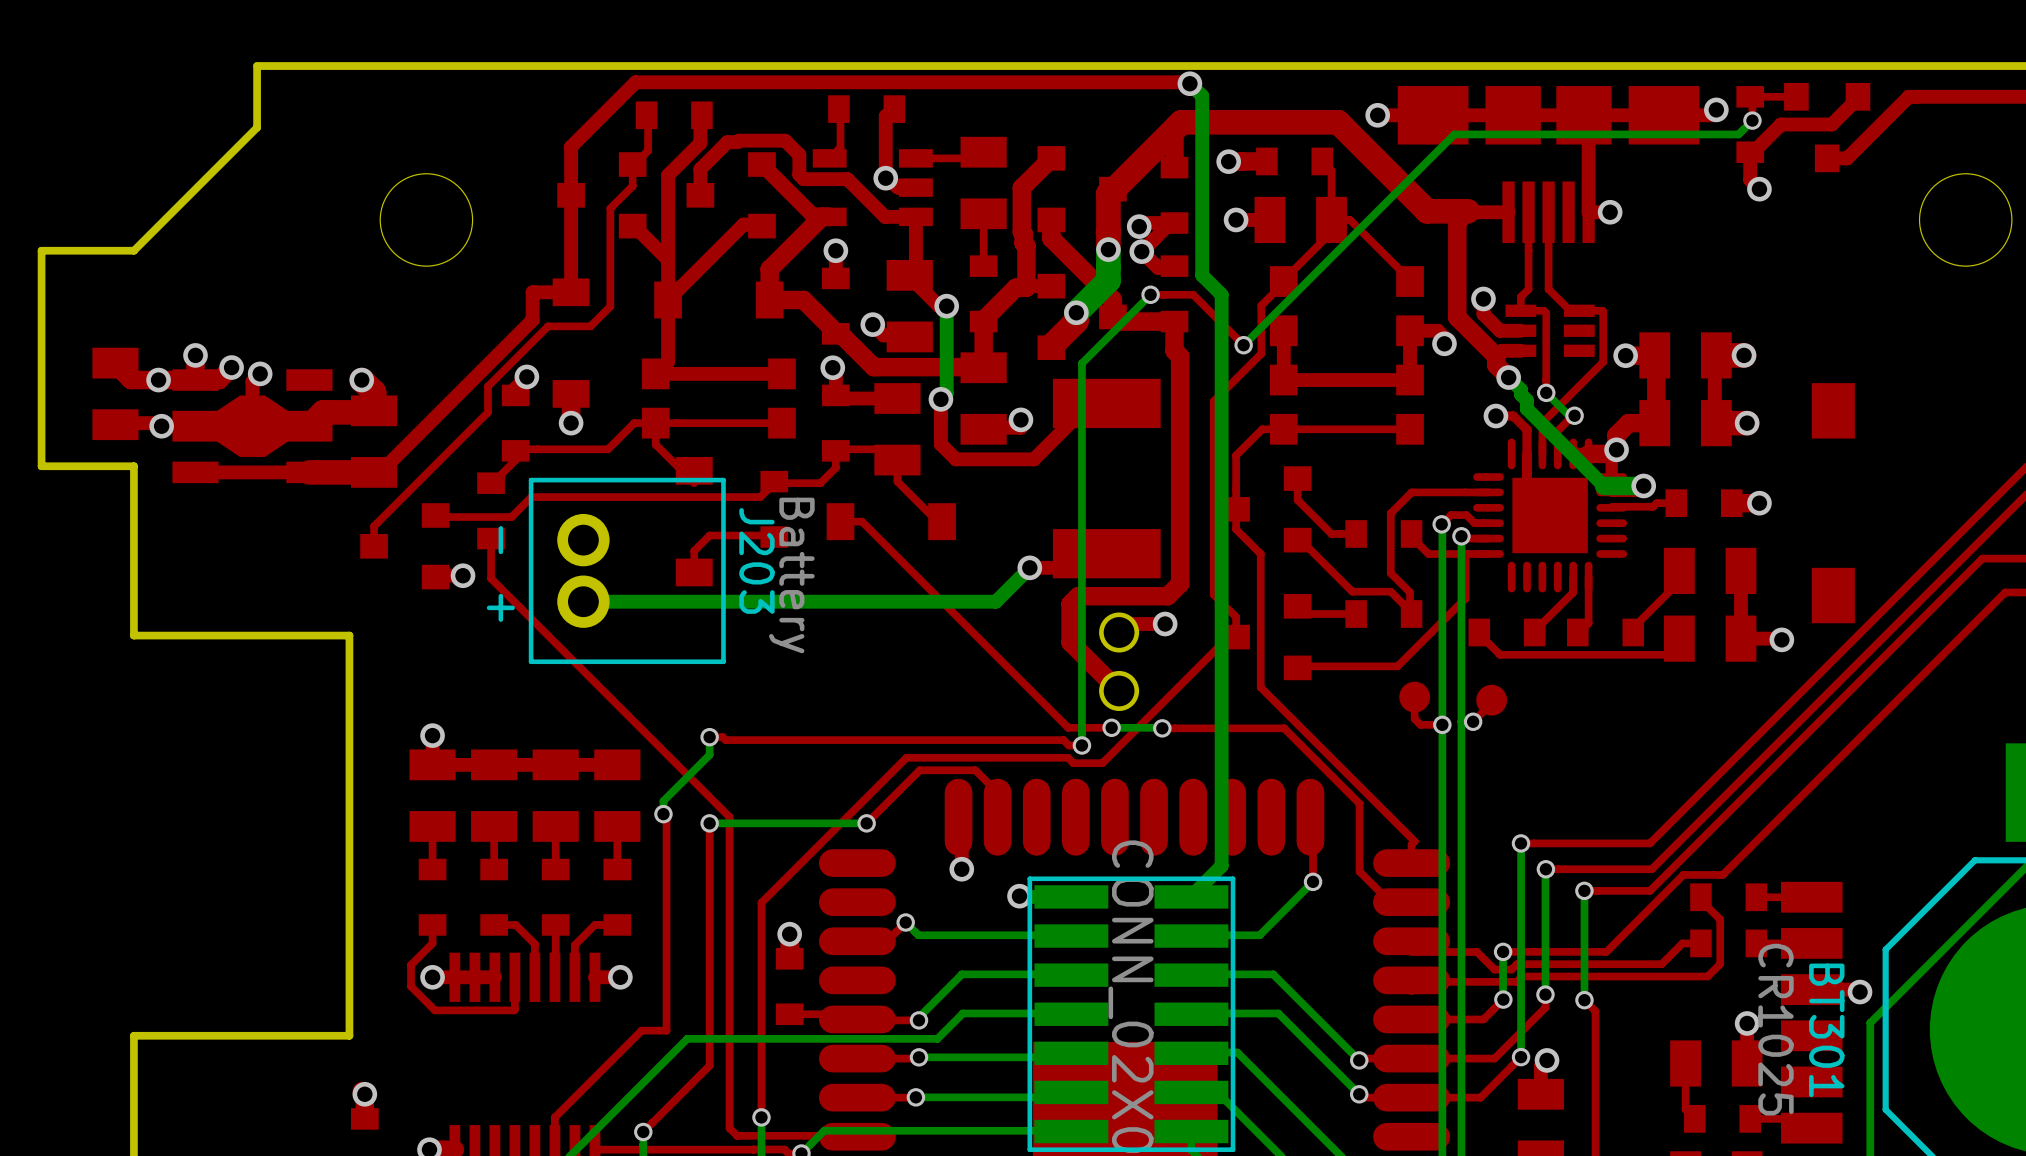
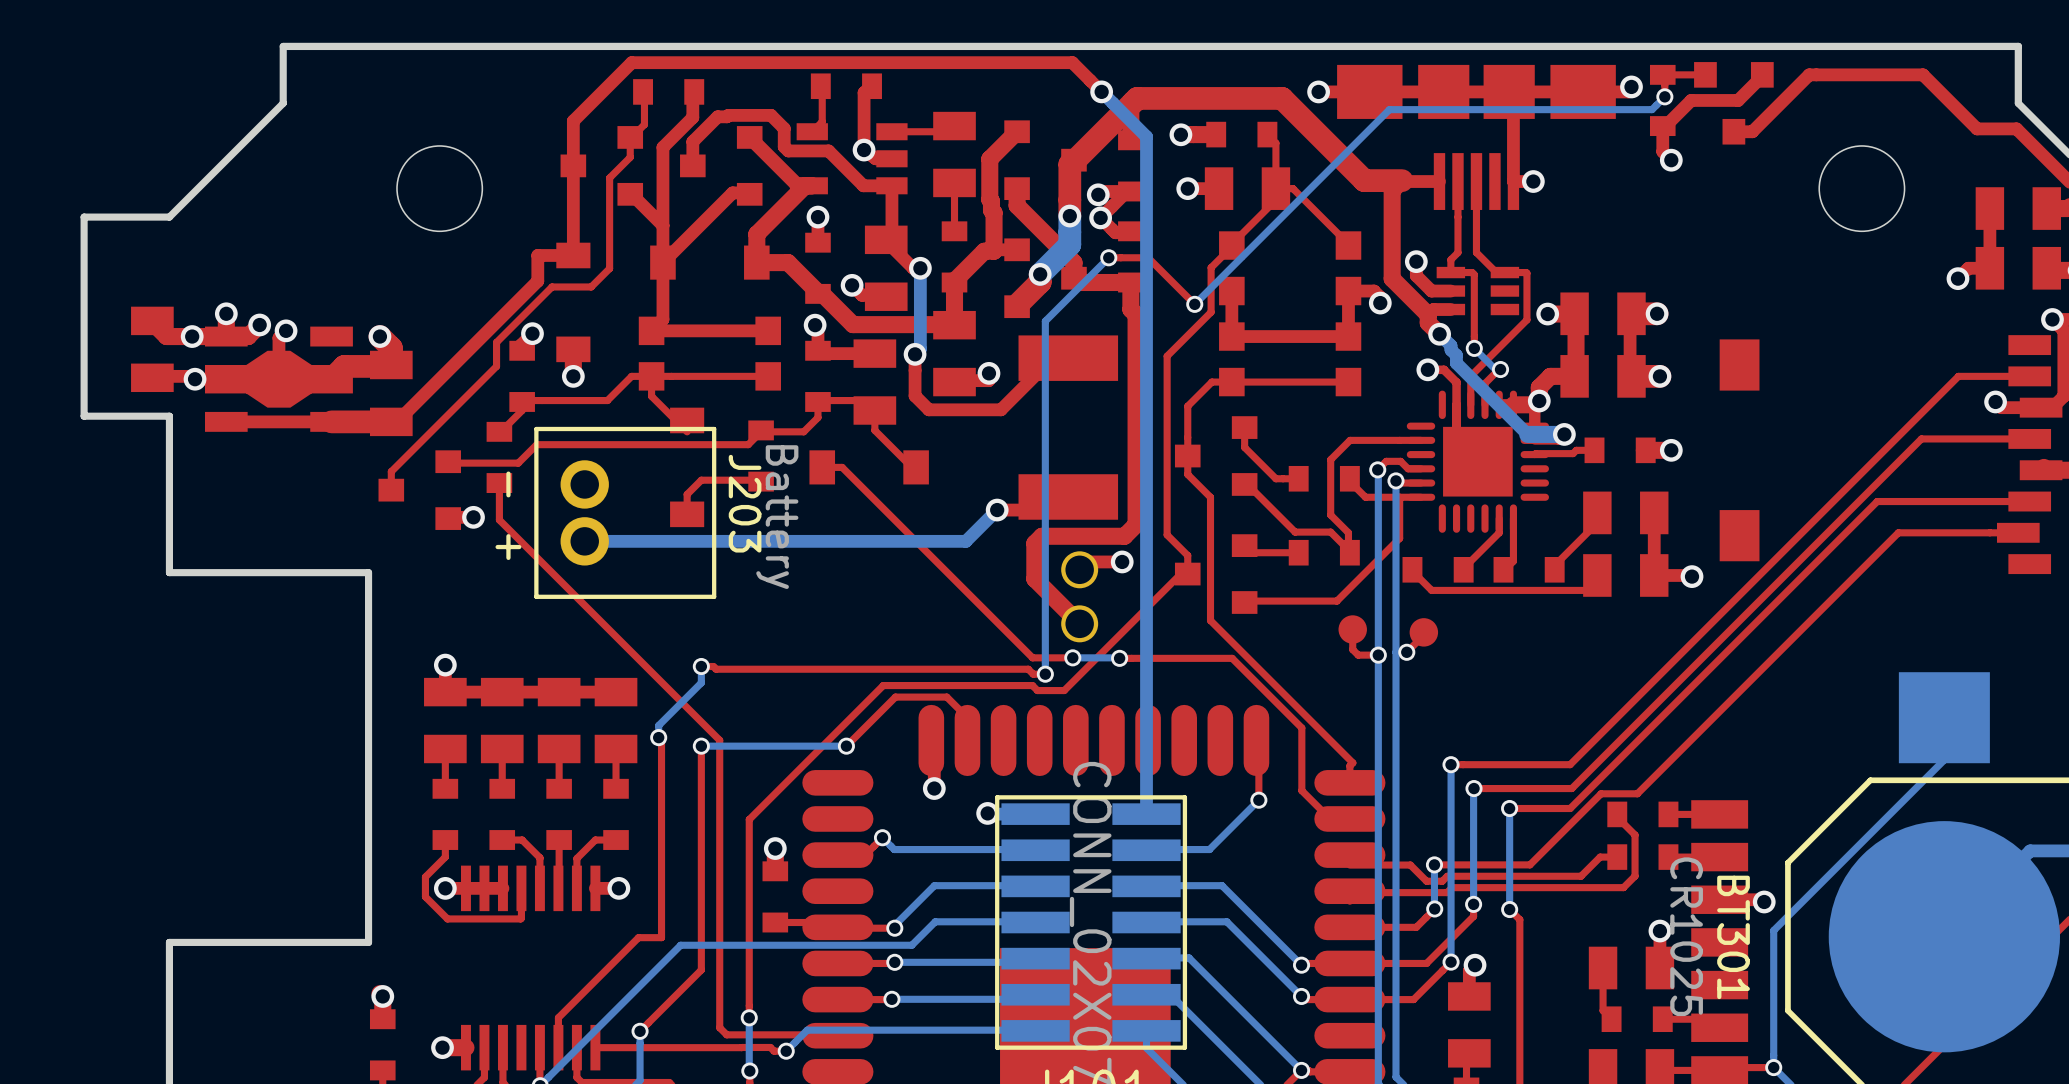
top track: (1189, 83) (634, 83) -> (1101, 91) (1072, 62) (631, 62)
bottom track: (1189, 83) (1202, 96) (1202, 275) (1221, 294) (1221, 865) (1191, 896) -> (1101, 91) (1146, 136) (1146, 813)
via position: (1189, 83) -> (1101, 91)

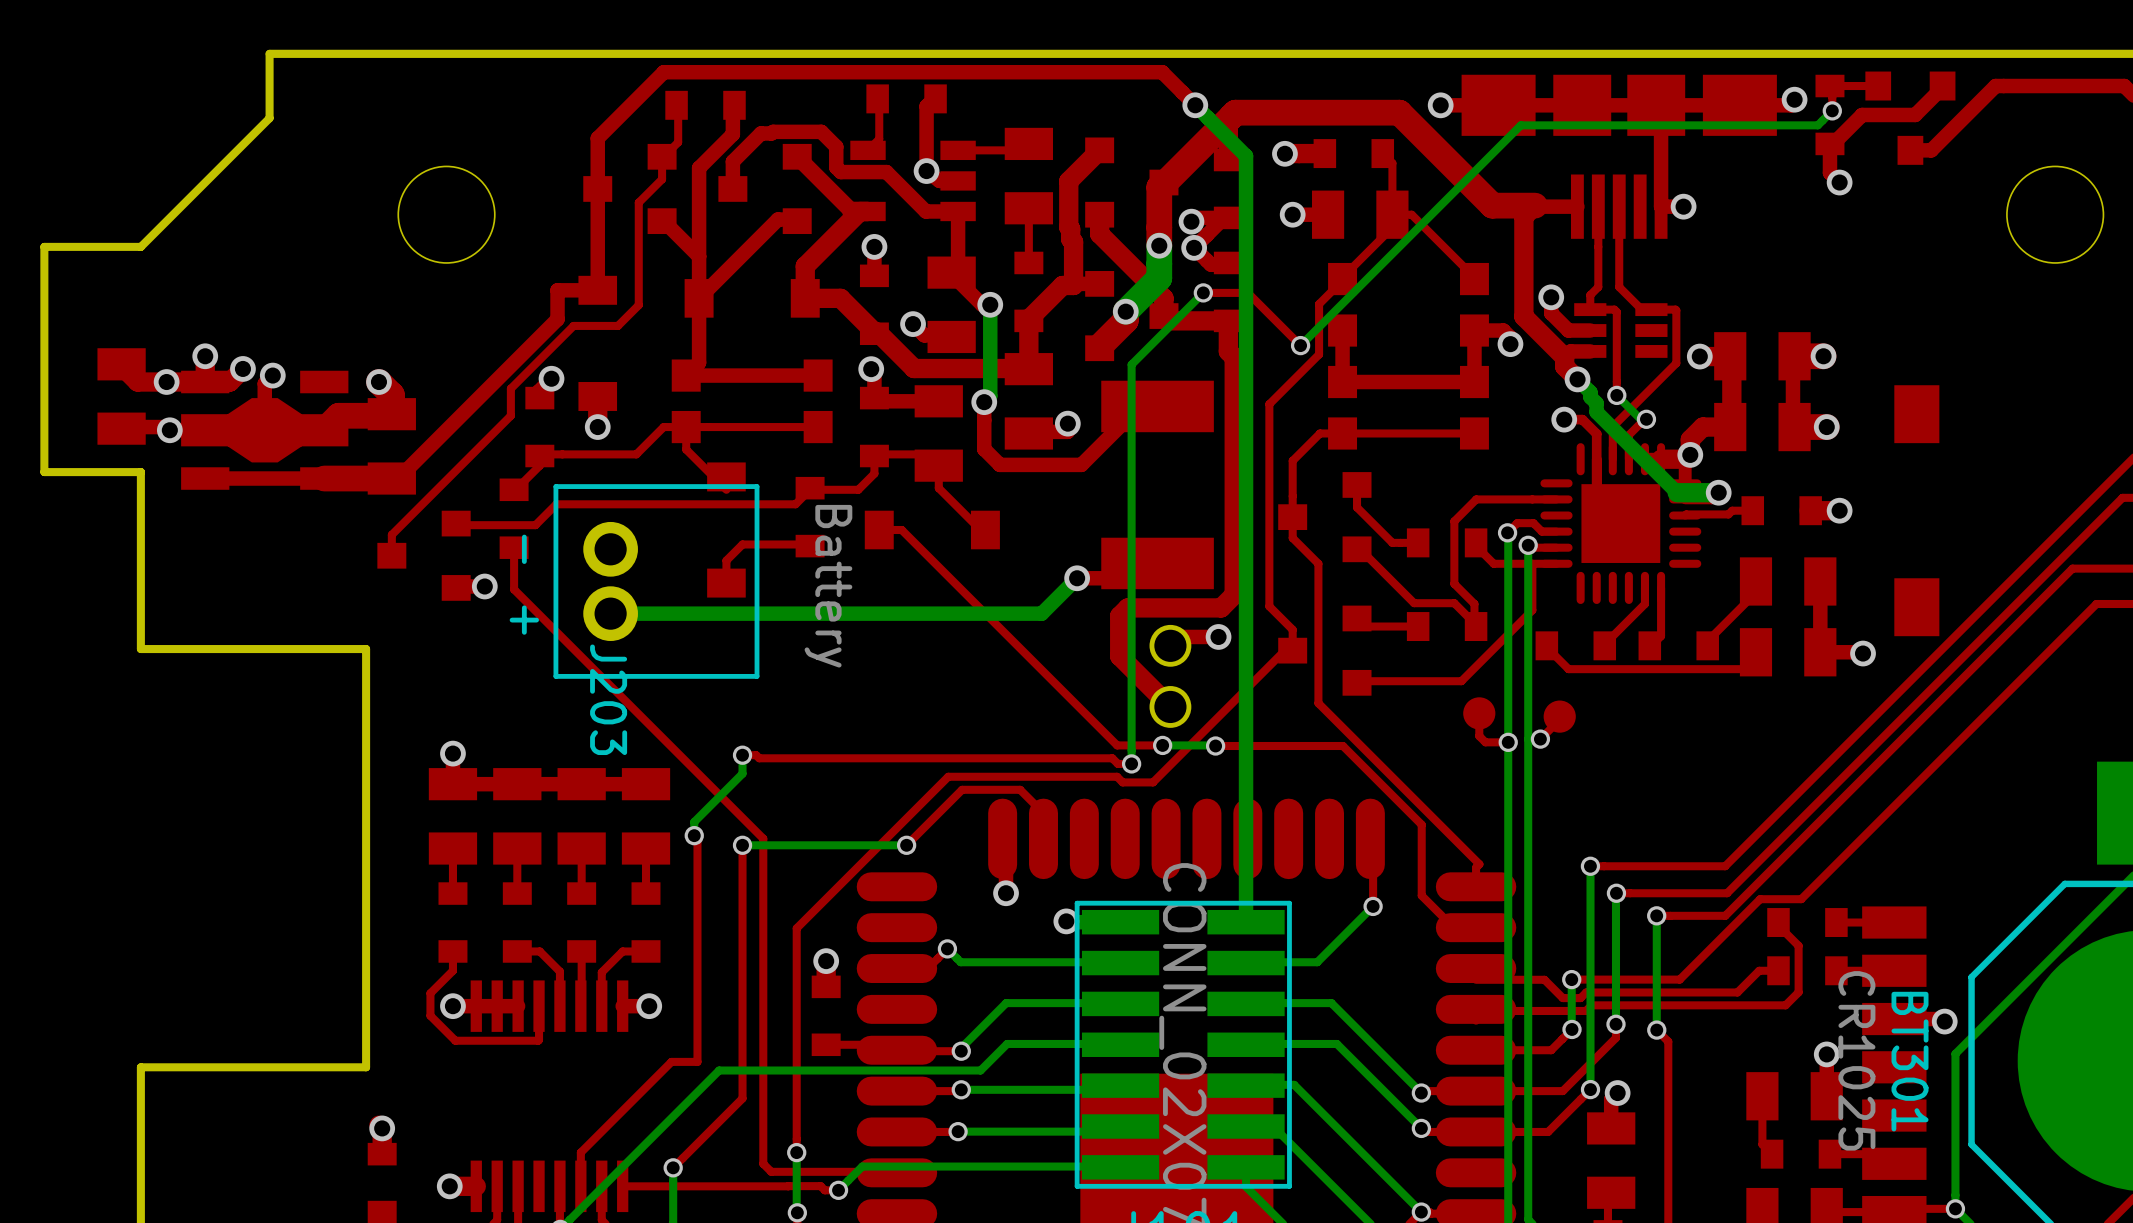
J203 name position: J203 (745, 503) -> J203 (608, 699)

